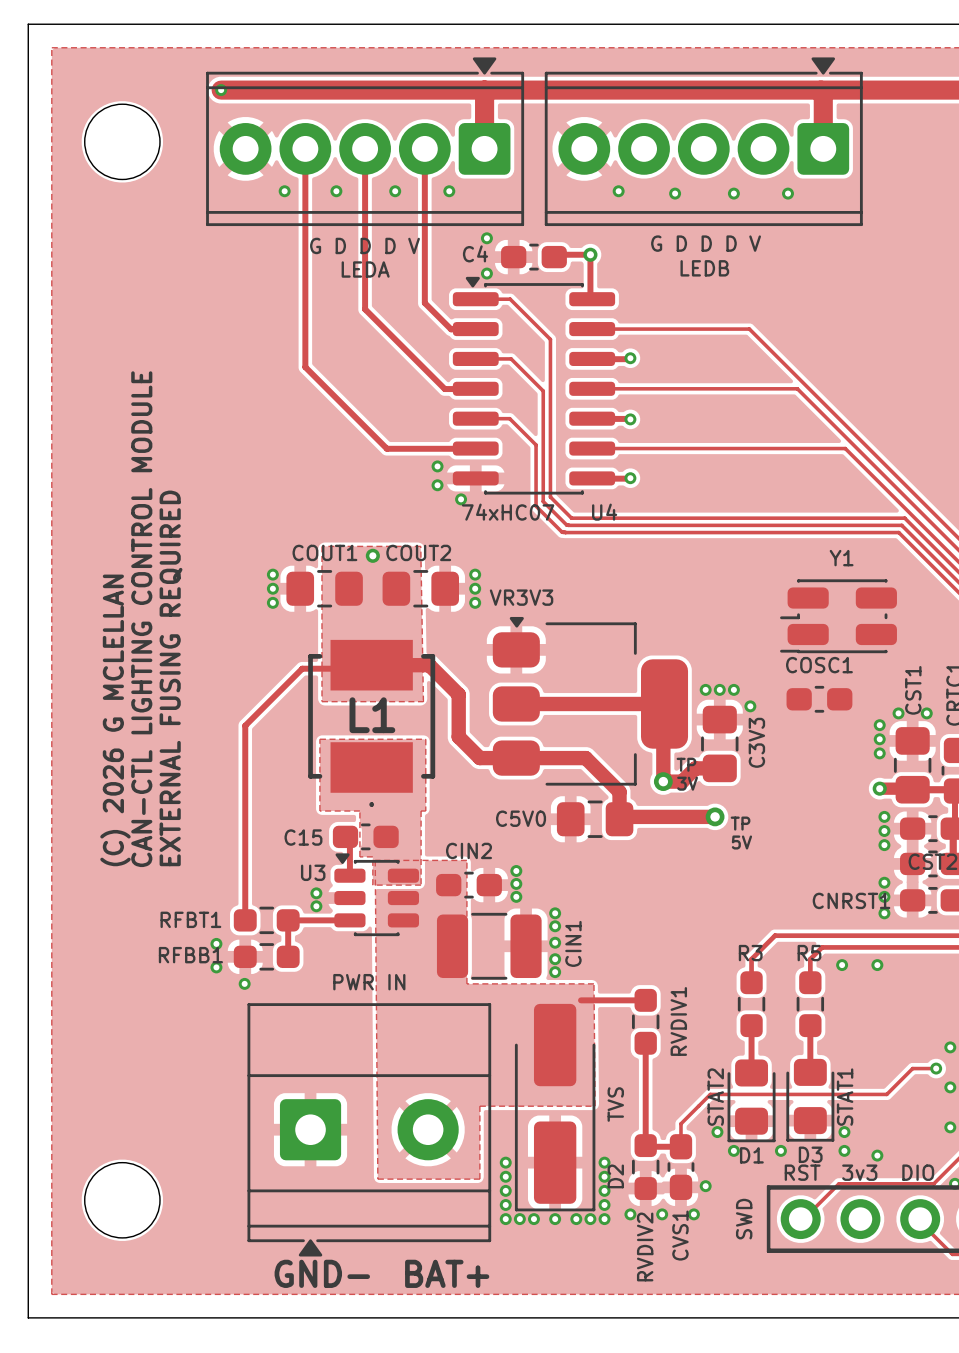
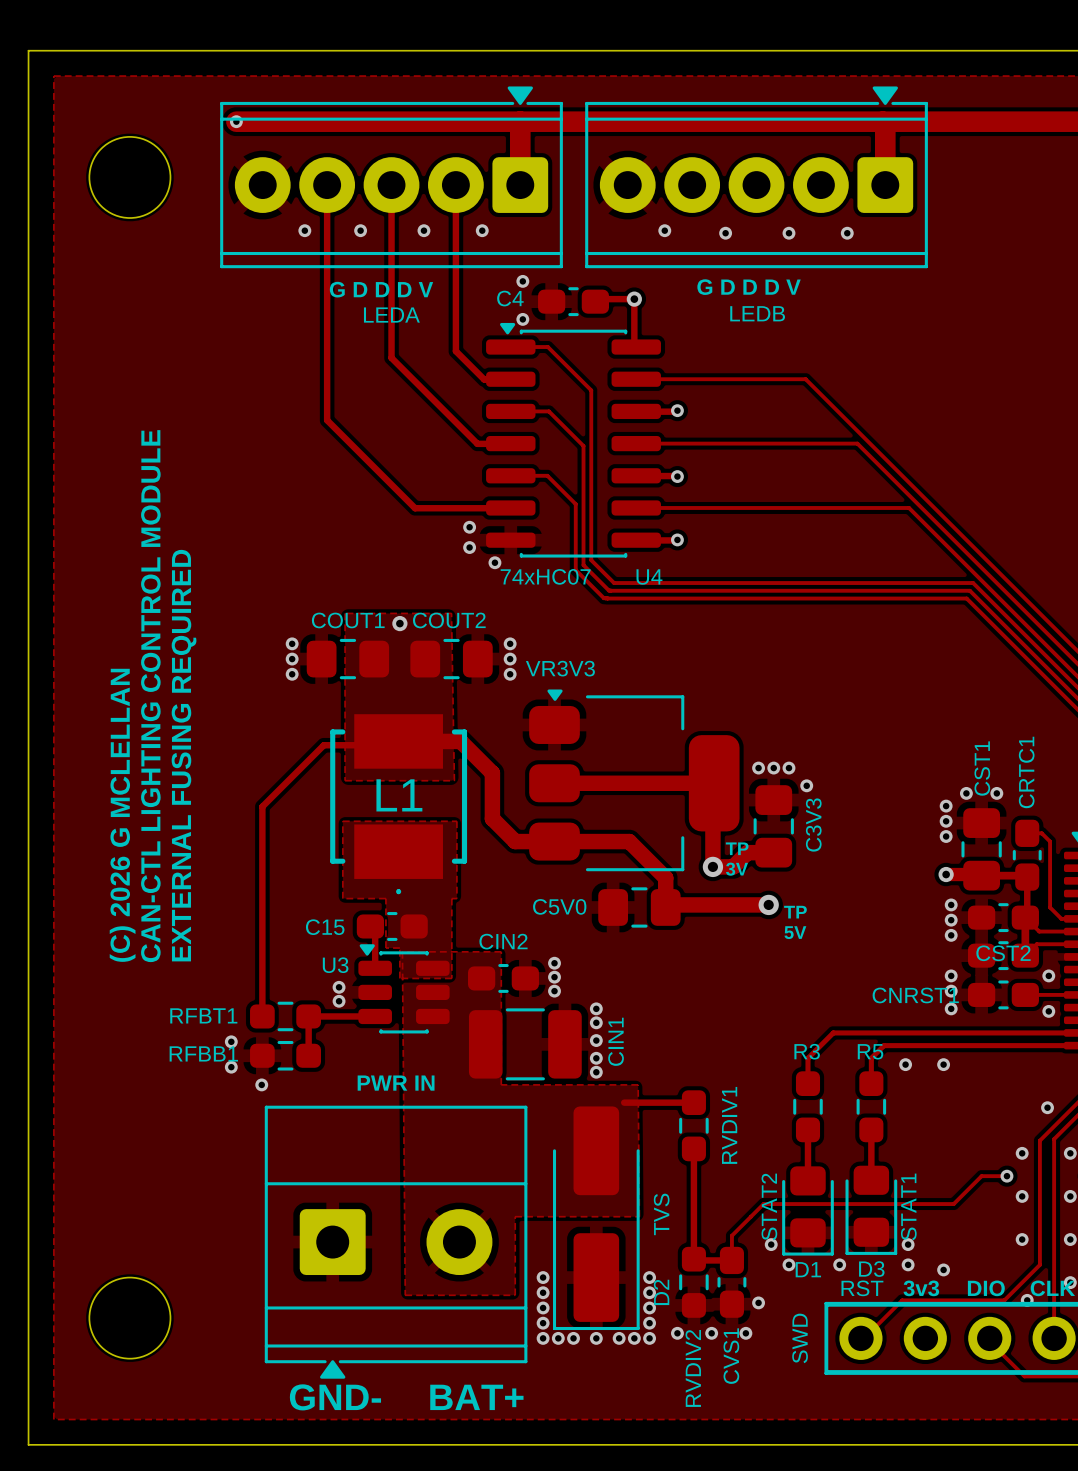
Y1: (838, 616) -> none
COSC1: (819, 699) -> none

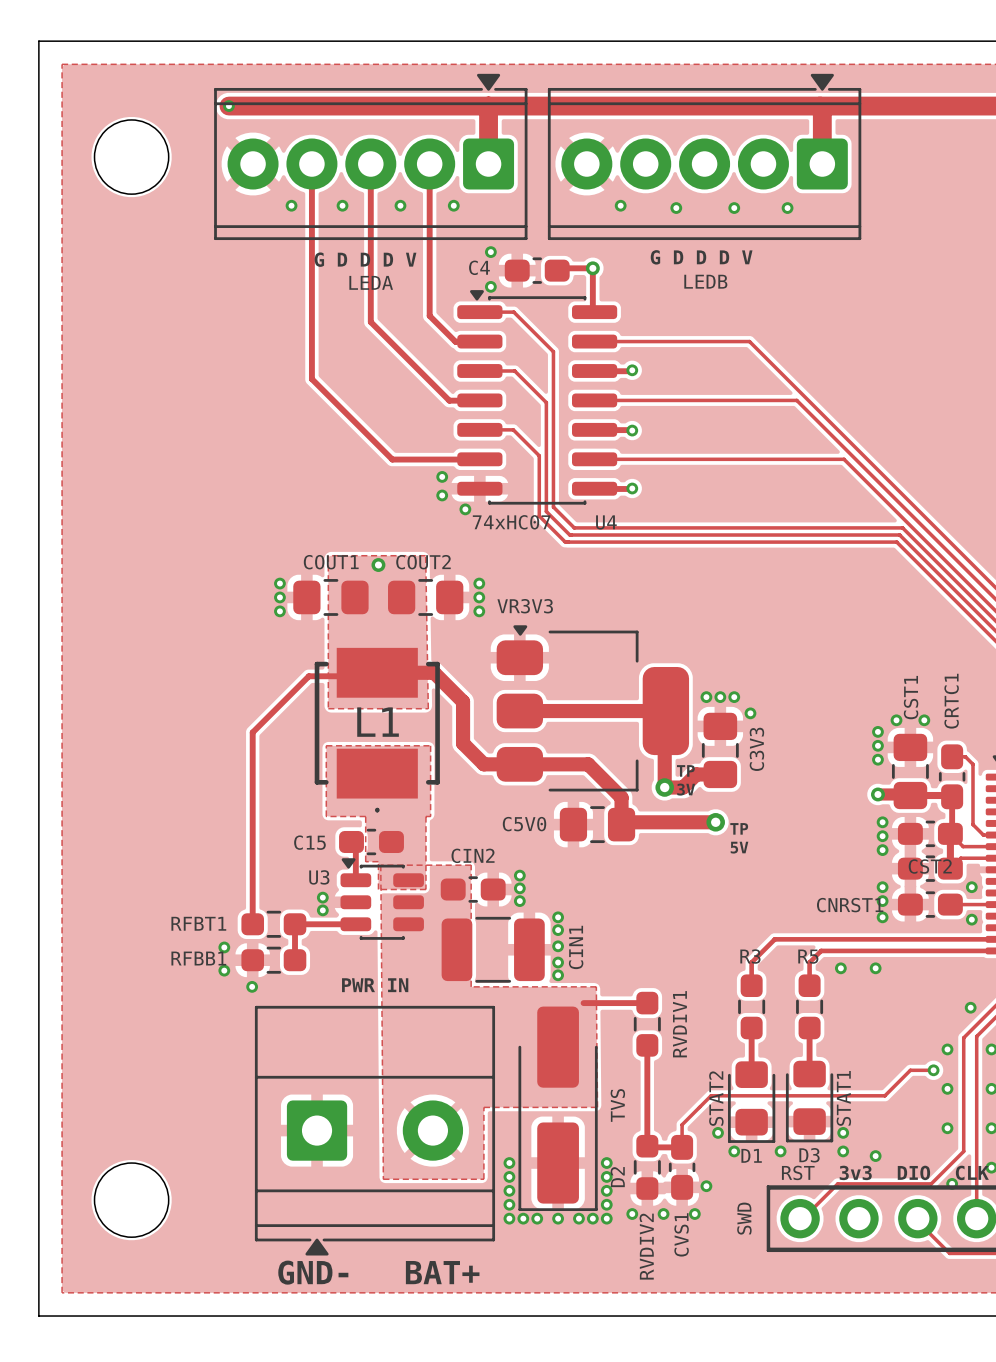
text: CAN-CTL LIGHTING CONTROL MODULE (150, 696) -> none
text: EXTERNAL FUSING REQUIRED (184, 755) -> none
text: (C) 2026 G MCLELLAN (122, 815) -> none

